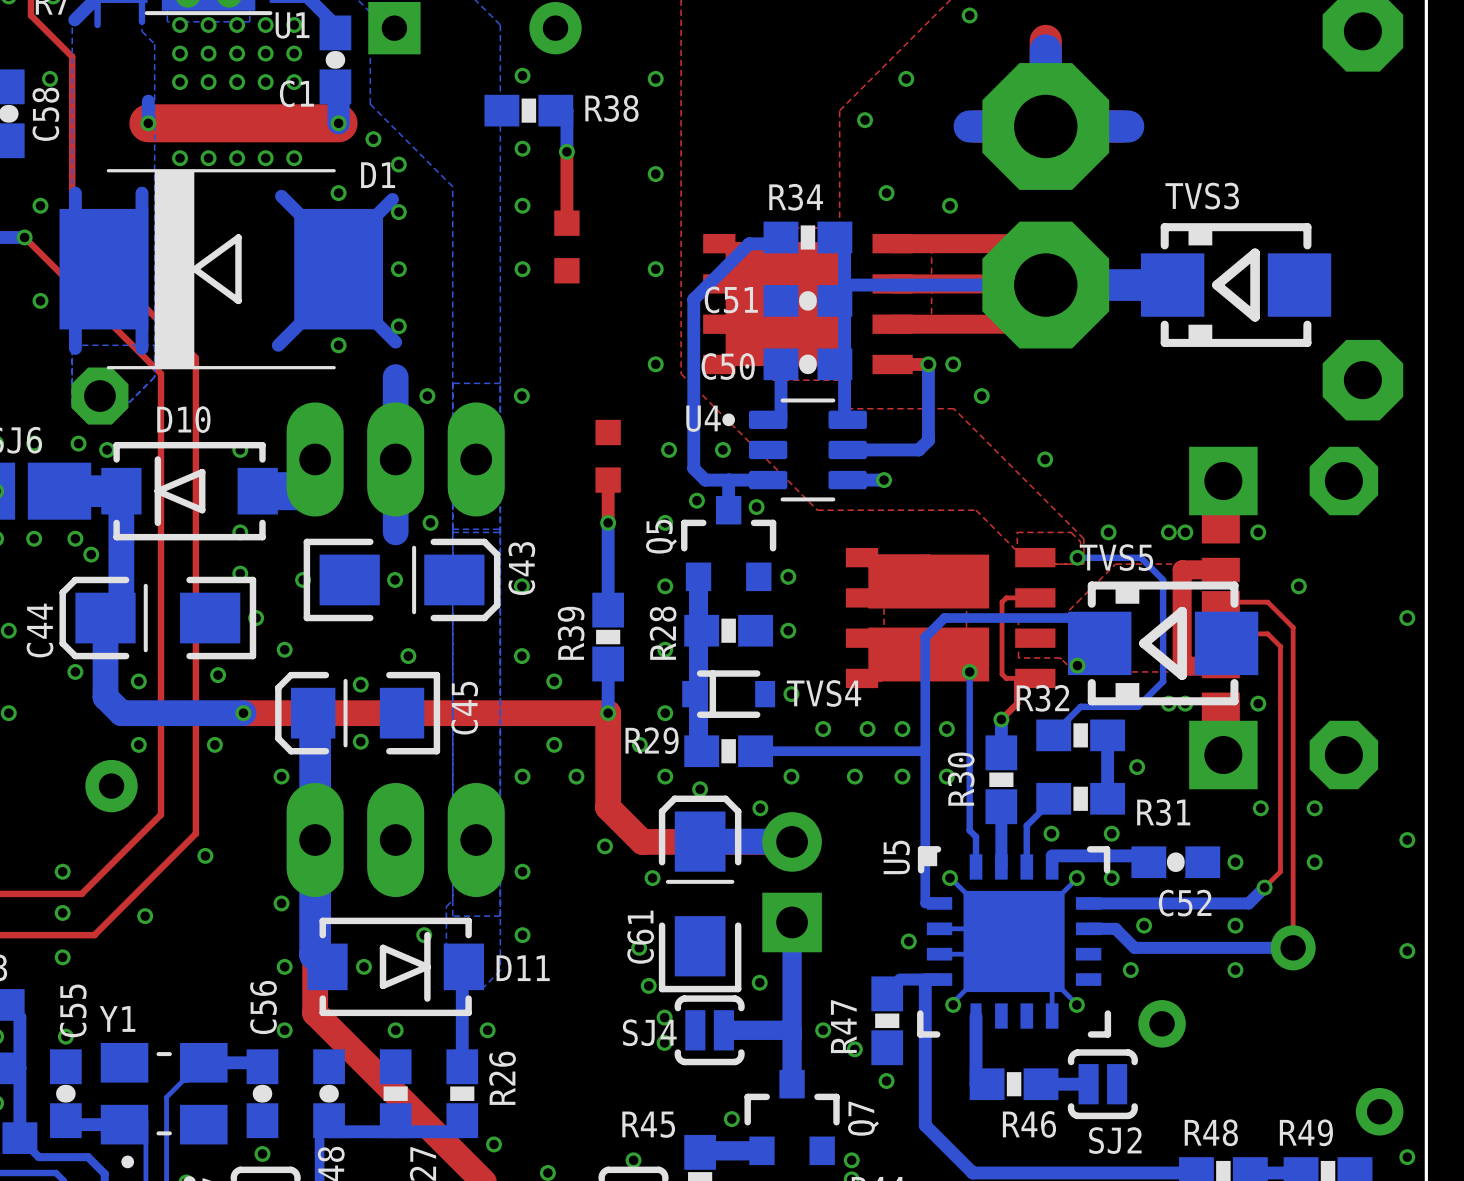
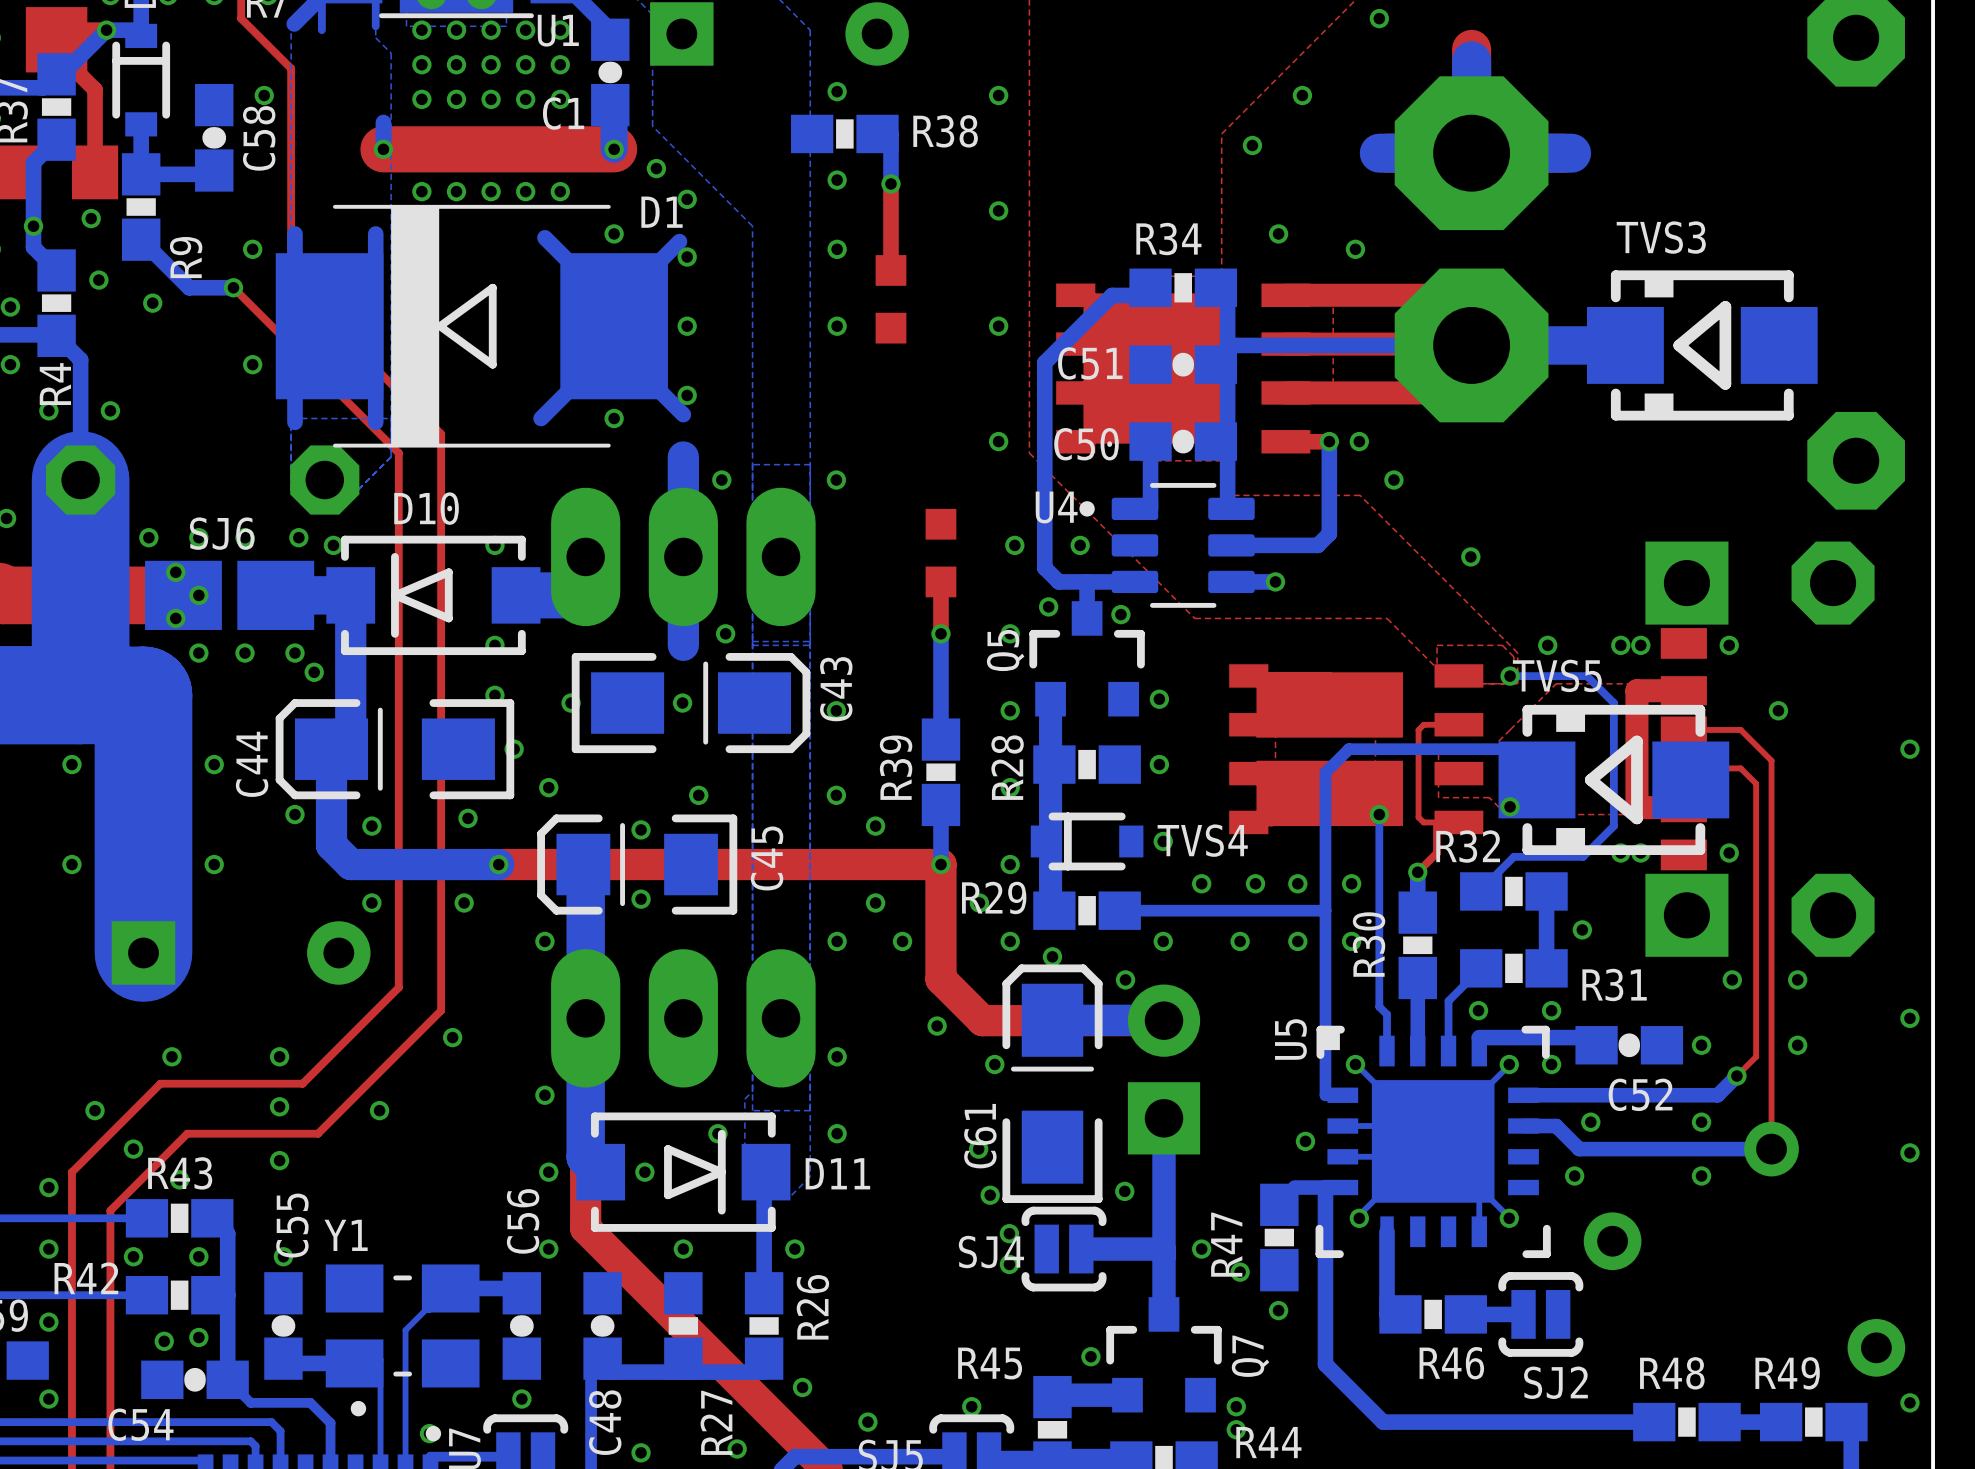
part footprint: [1189, 446, 1379, 790] -> [1645, 541, 1875, 957]

